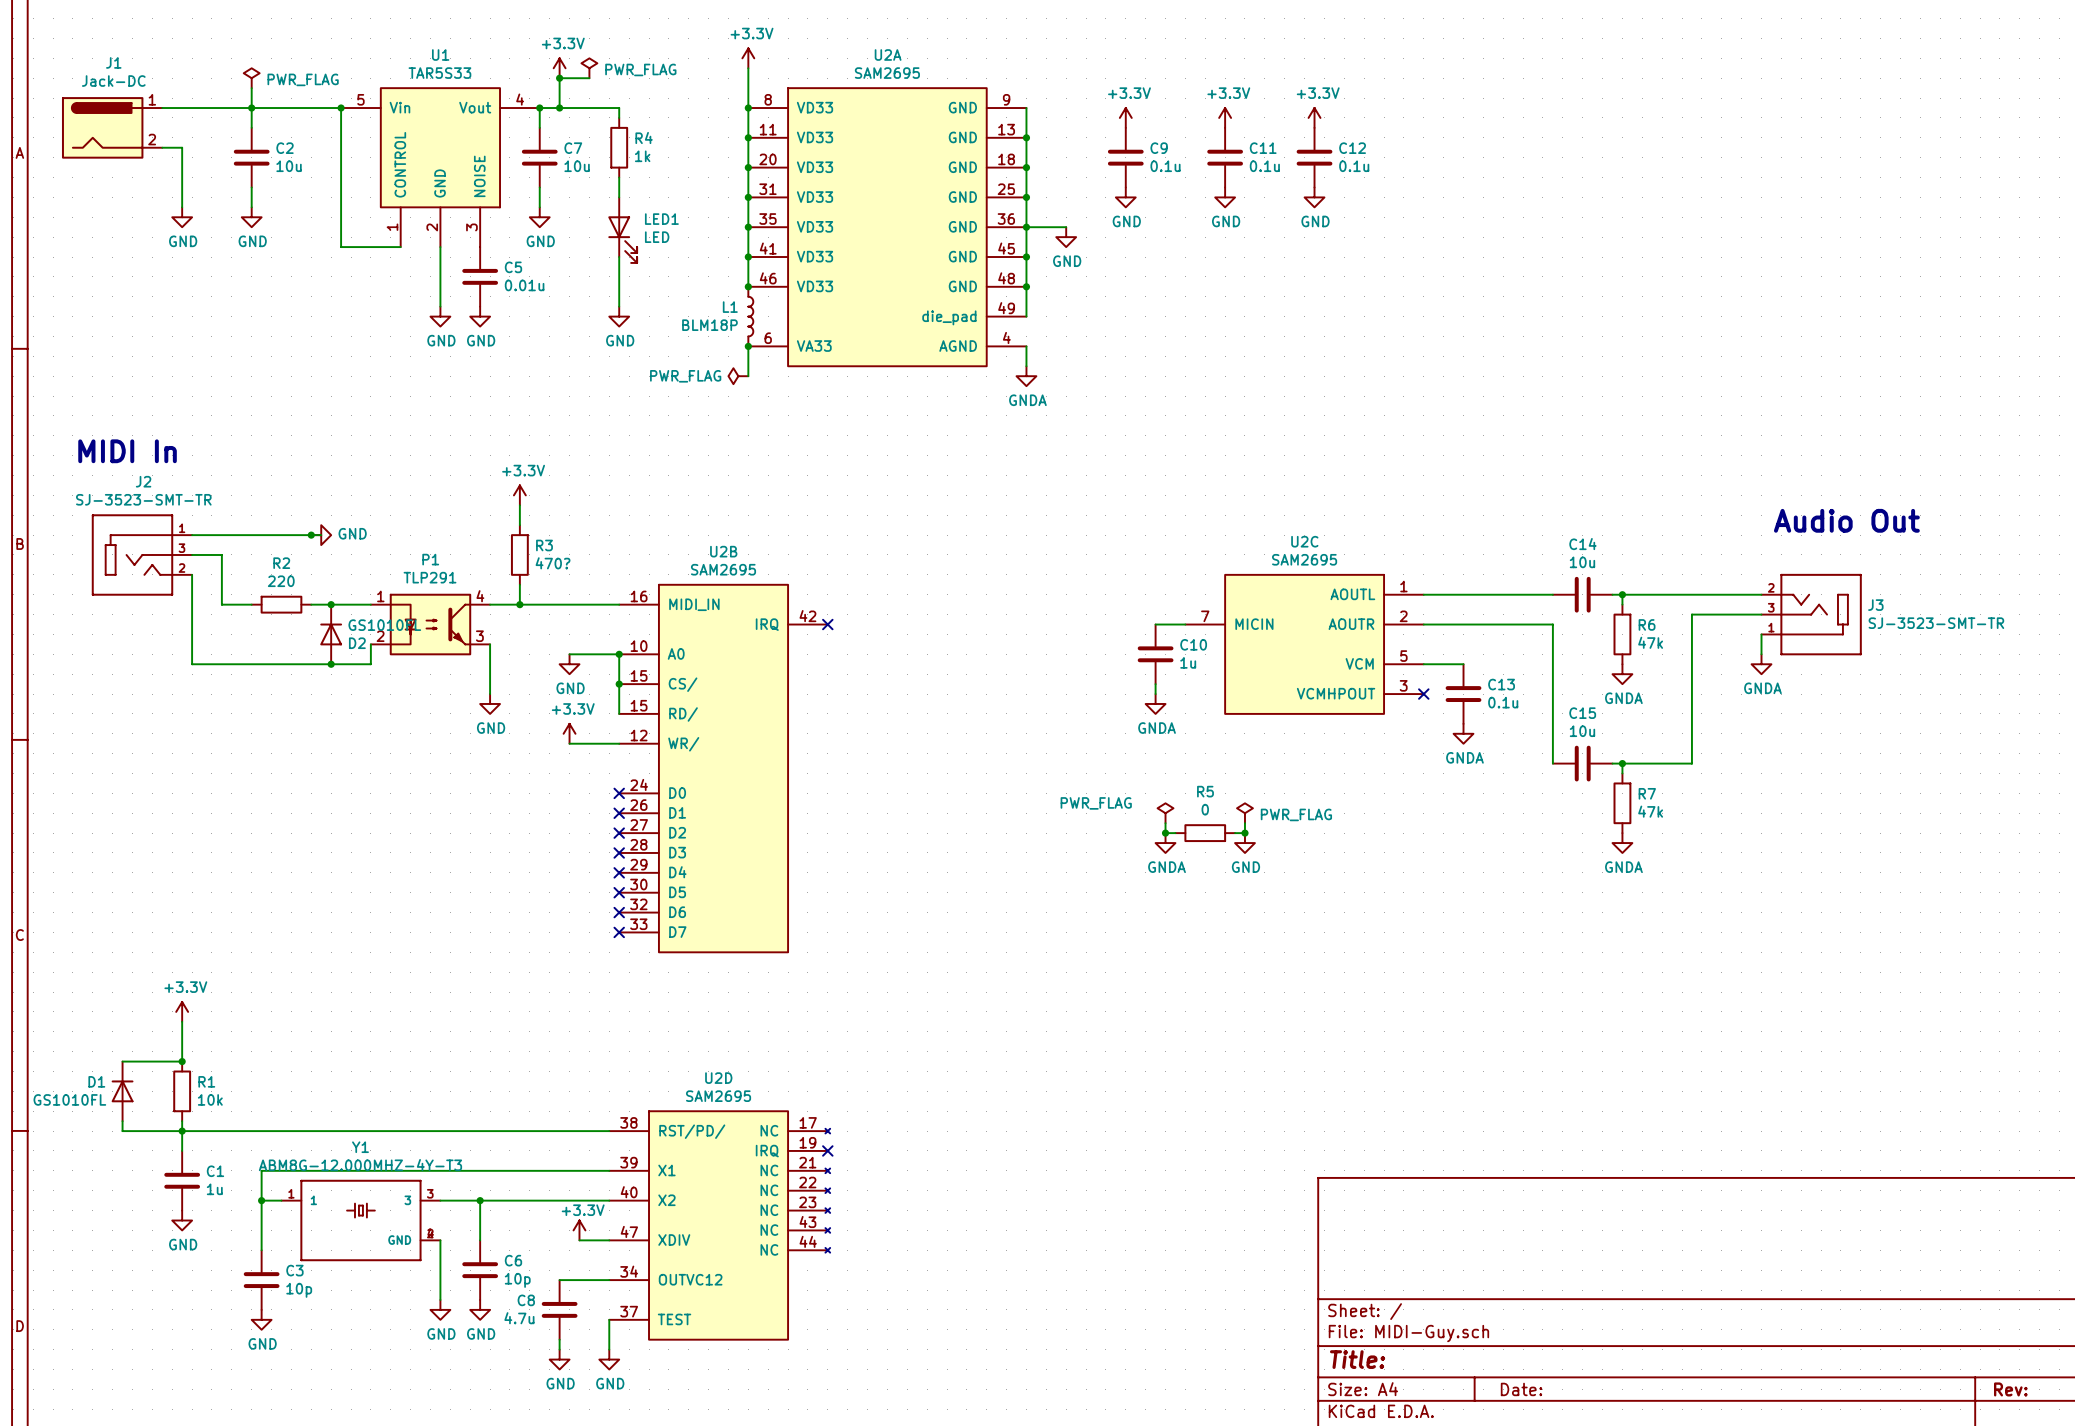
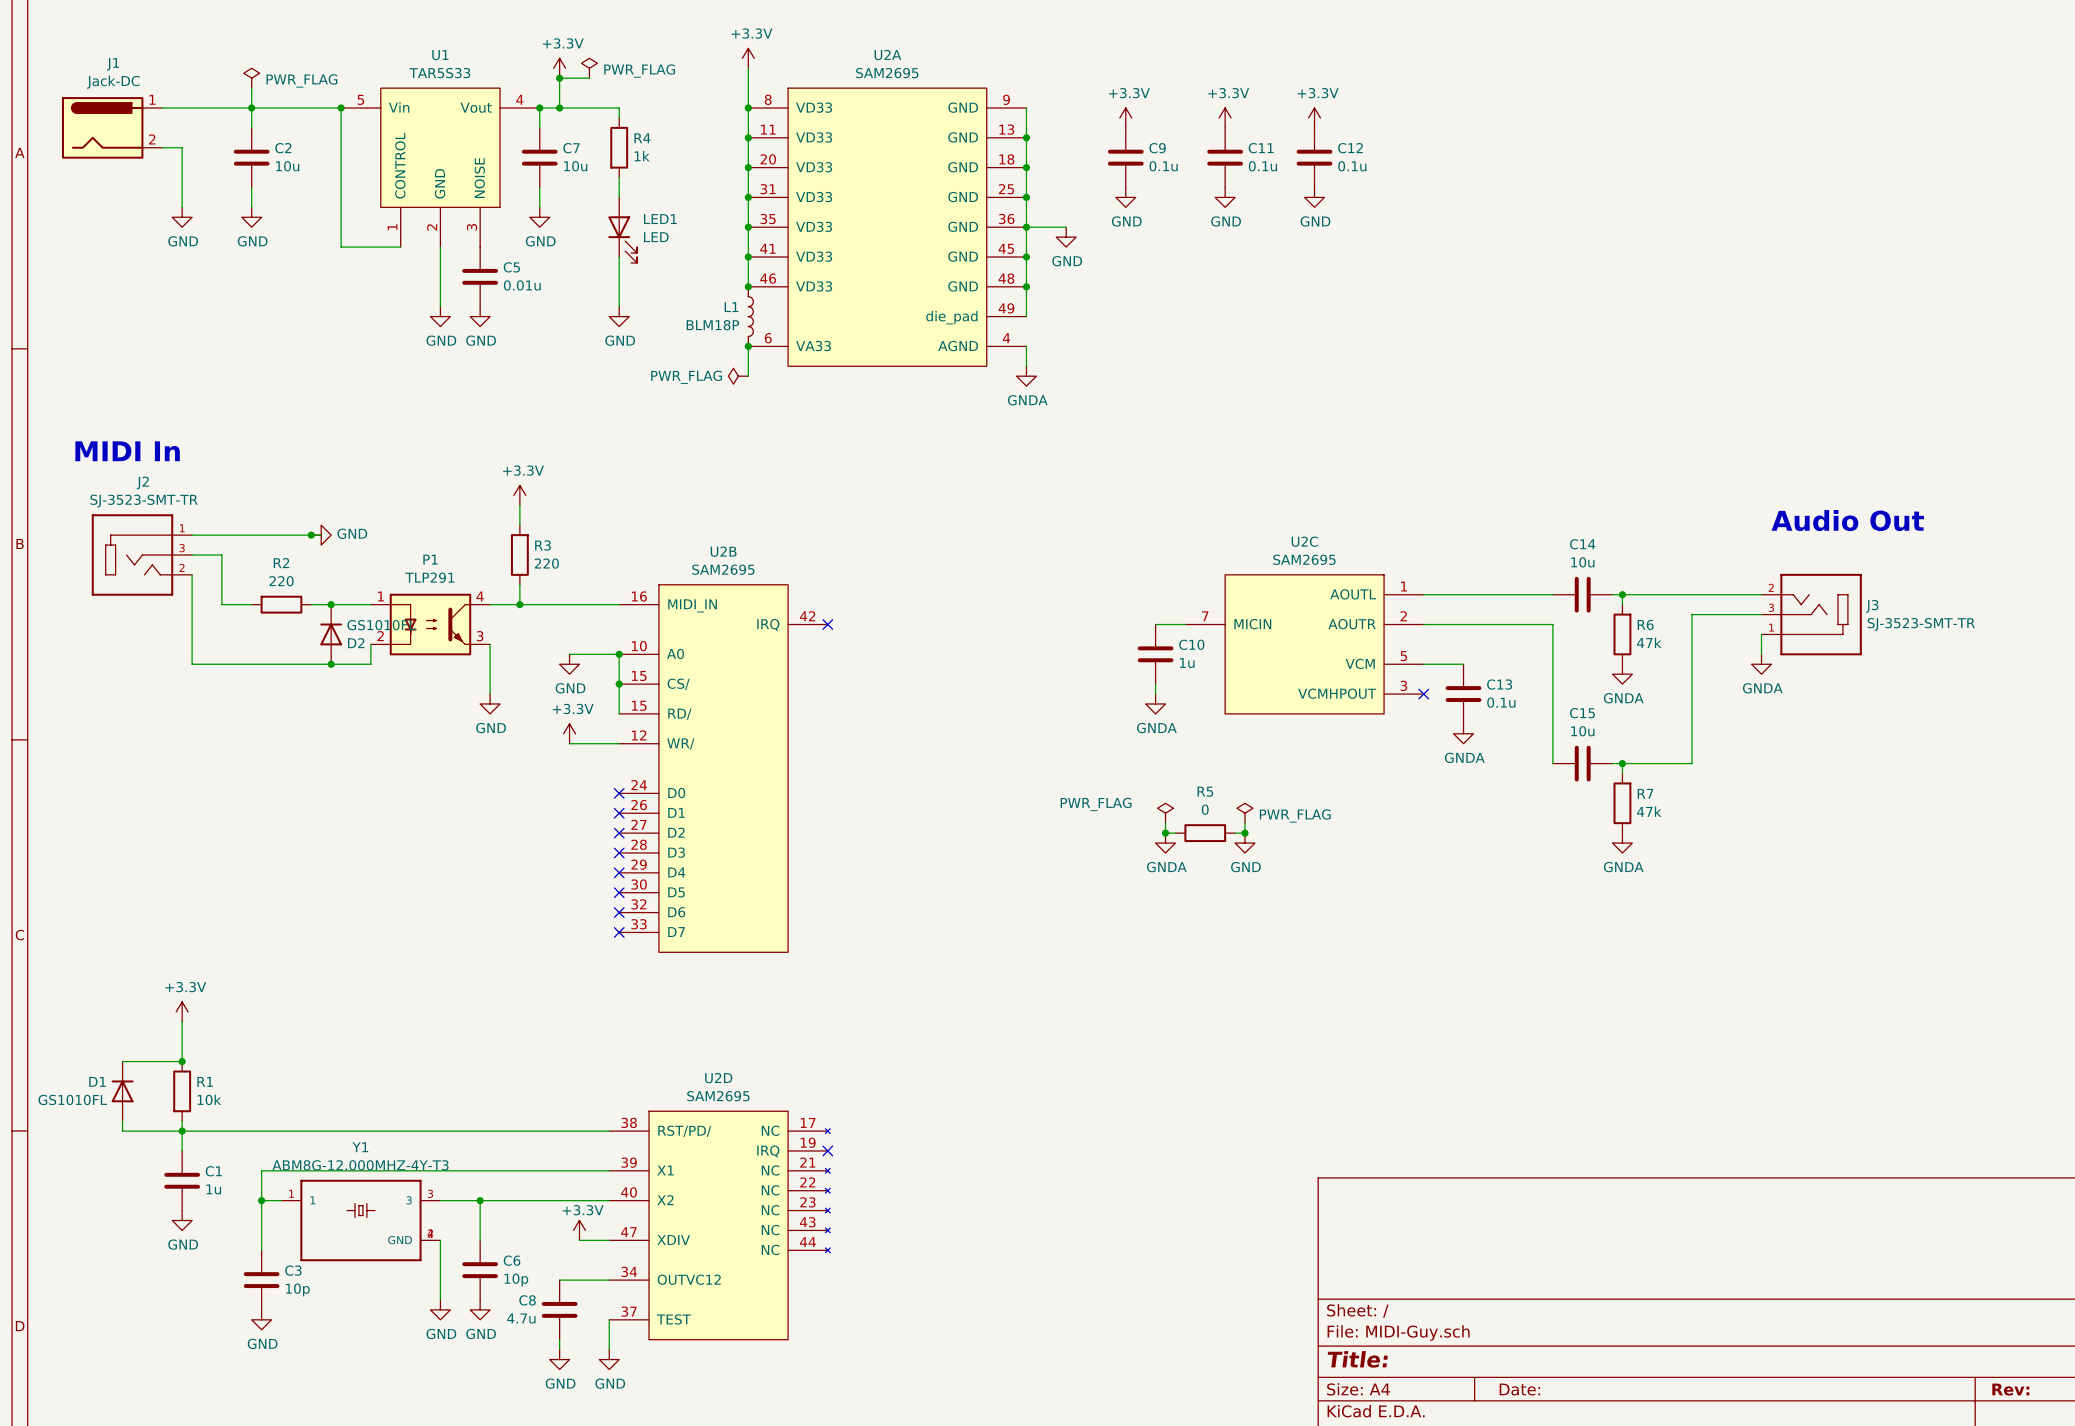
R3 value: 470? (553, 563) -> 220 (546, 563)

